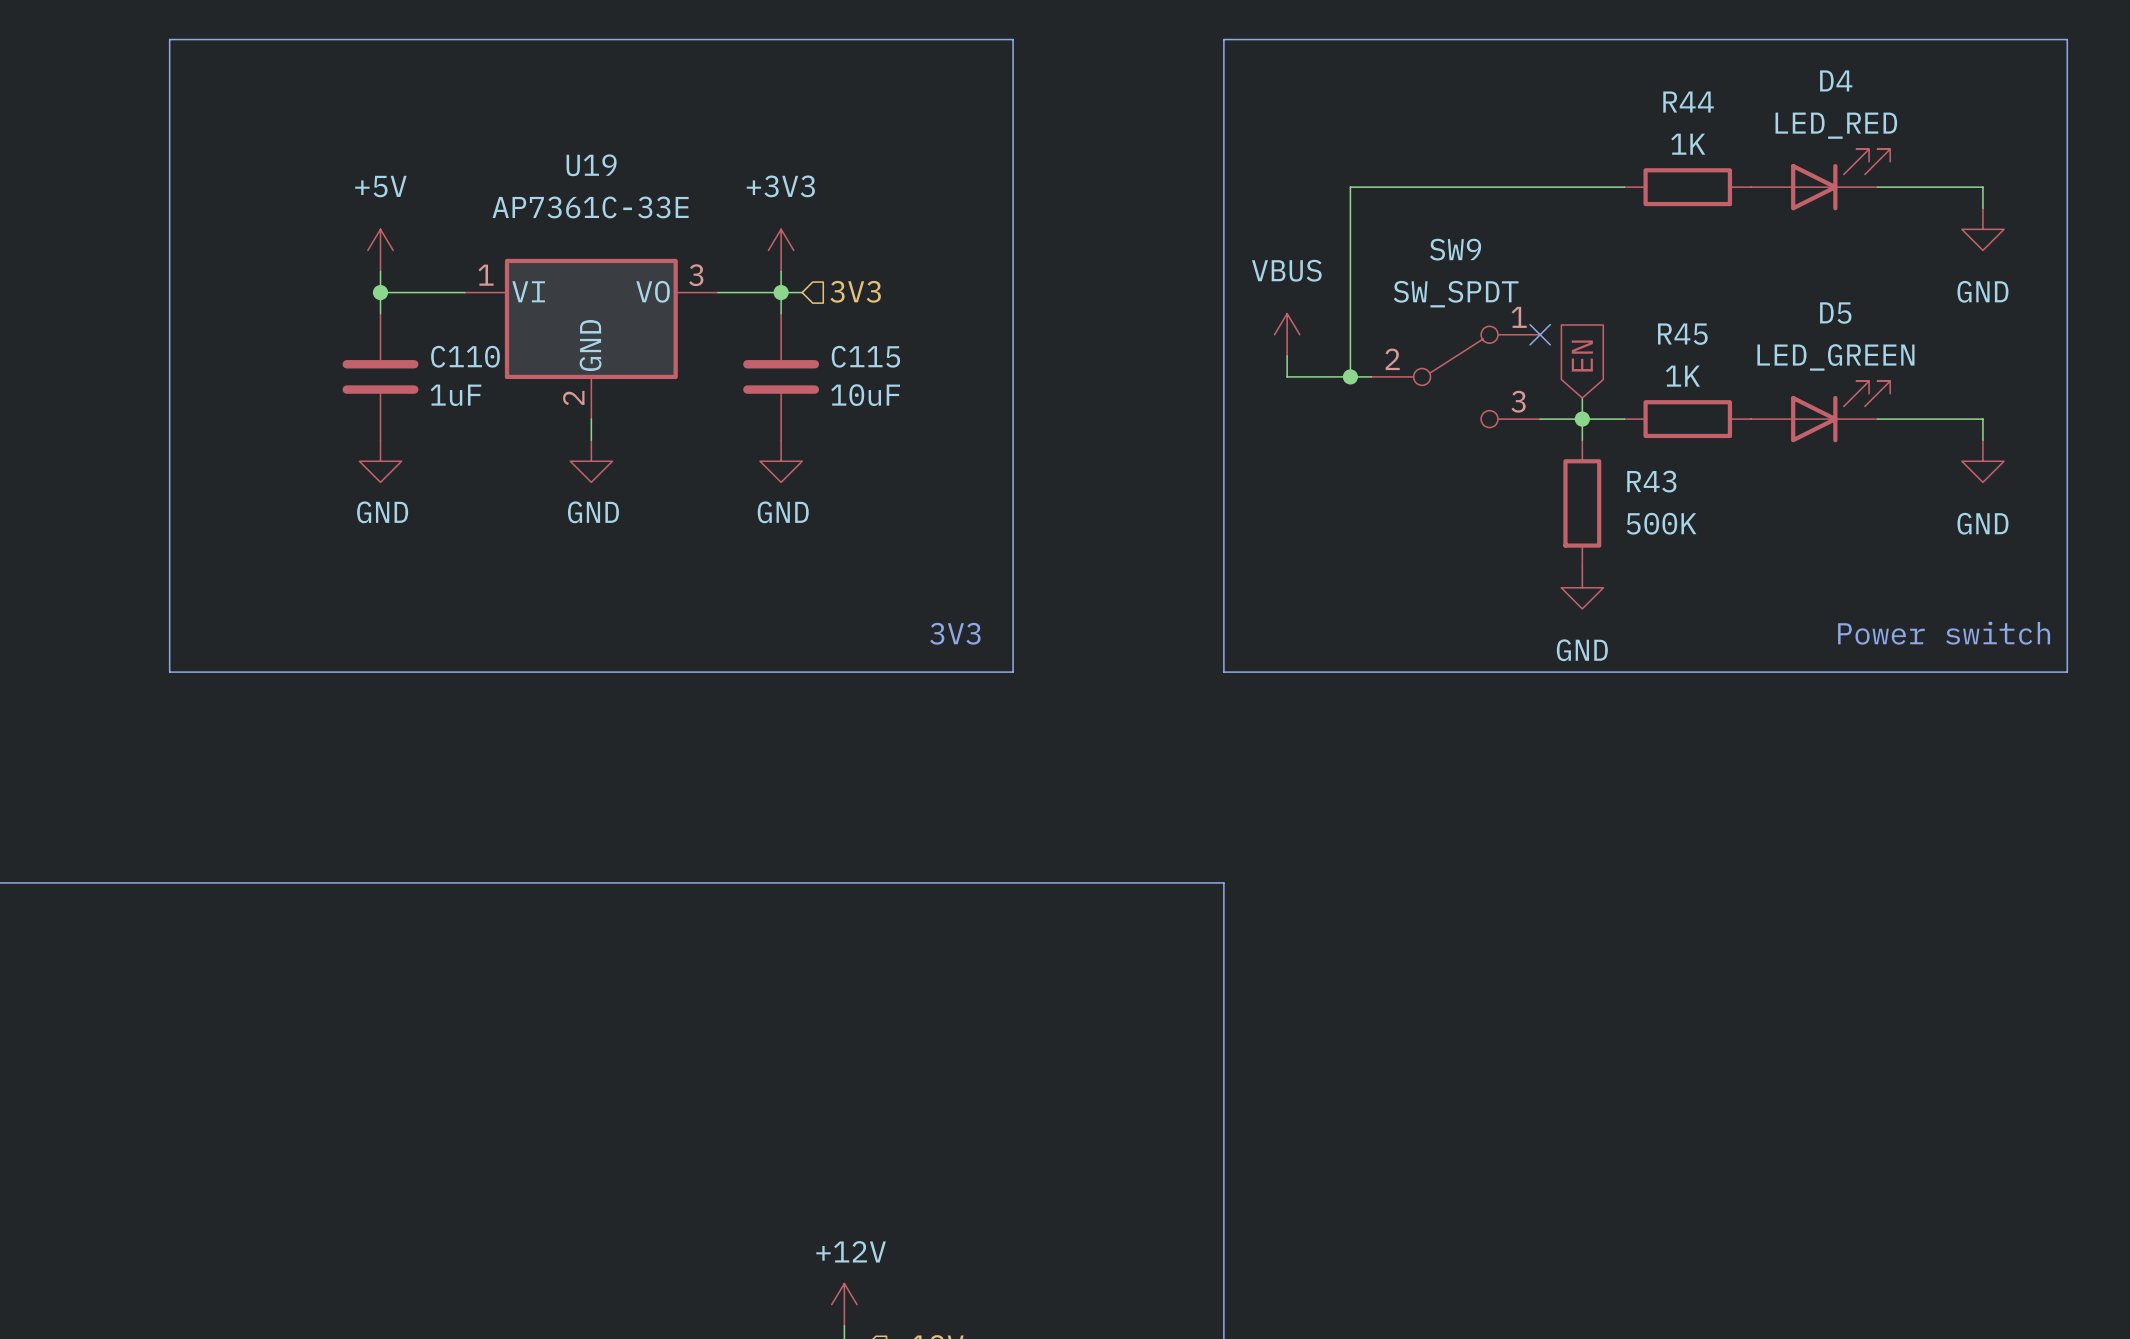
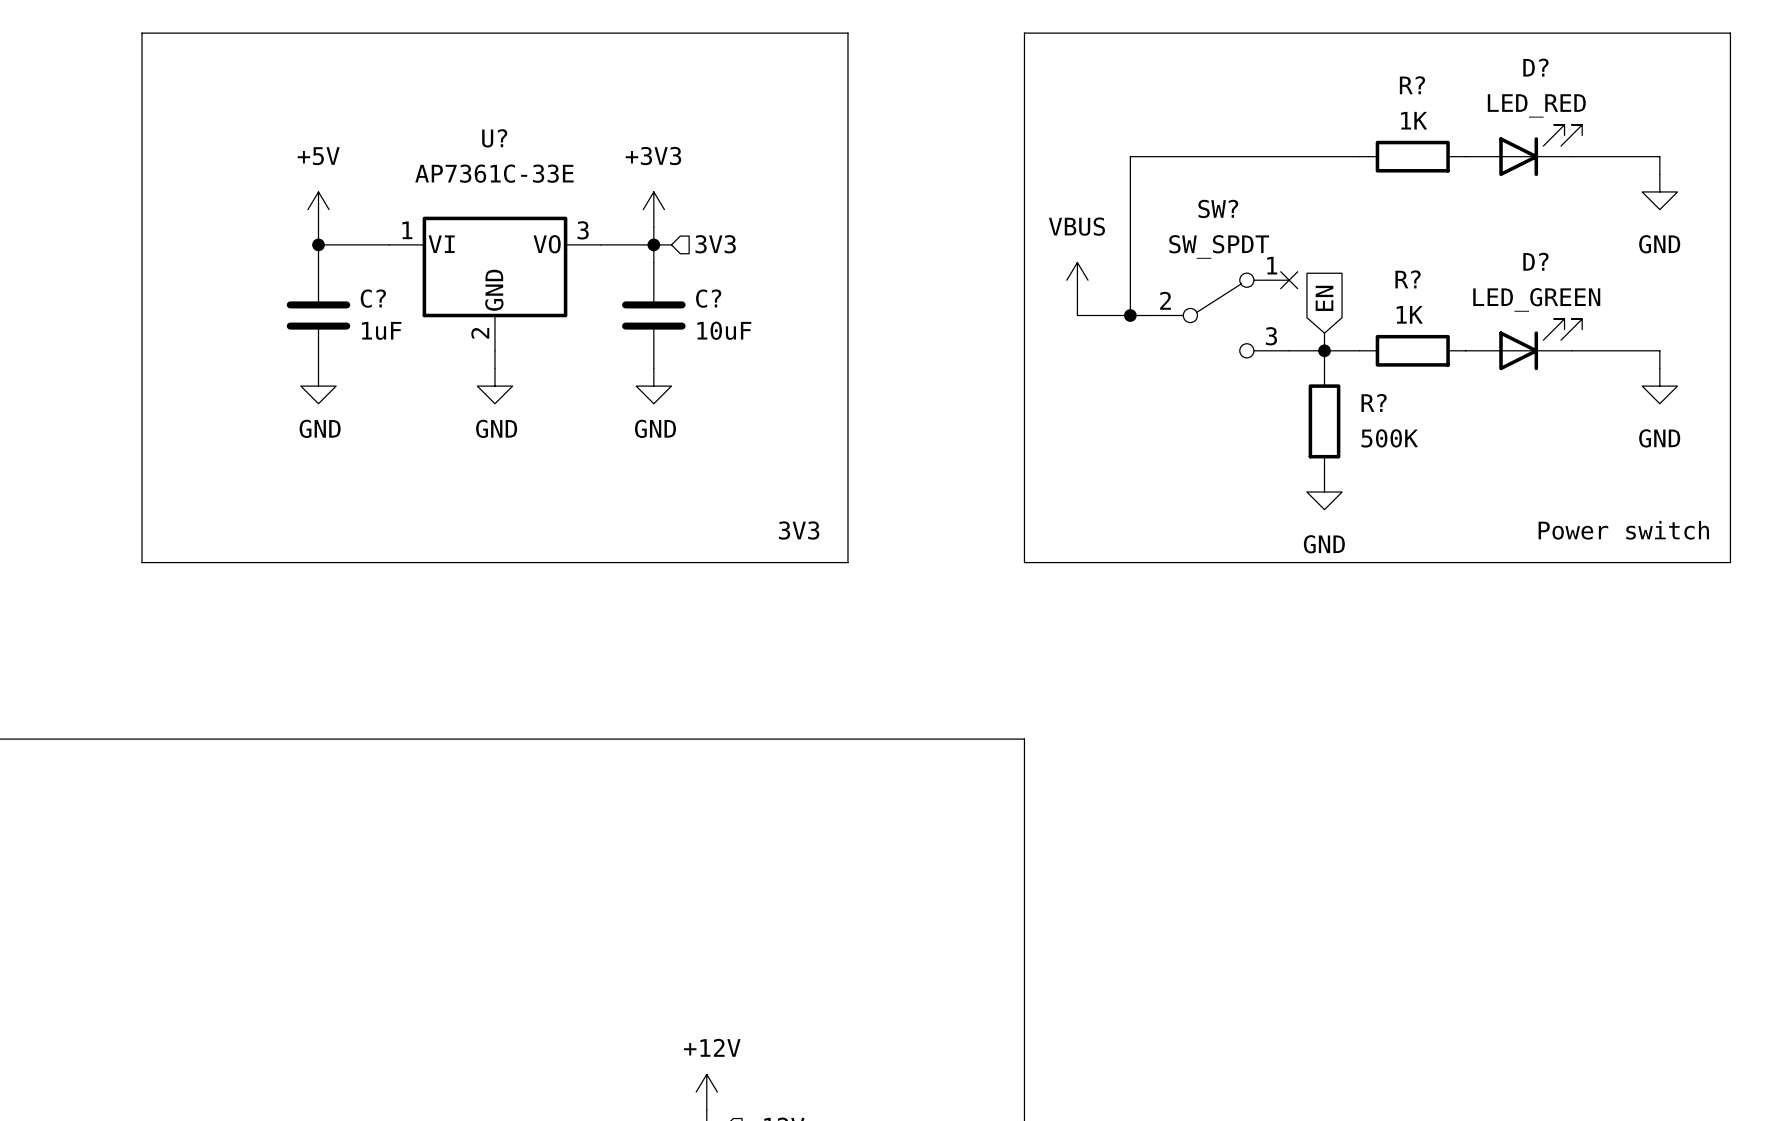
D4 name: D4 (1836, 80) -> D? (1535, 67)
R44 name: R44 (1688, 102) -> R? (1412, 85)
U19 name: U19 (591, 165) -> U? (494, 138)
SW9 name: SW9 (1455, 249) -> SW? (1218, 208)
D5 name: D5 (1835, 313) -> D? (1535, 261)
R45 name: R45 (1682, 334) -> R? (1408, 279)
C110 name: C110 (465, 356) -> C? (373, 298)
C115 name: C115 (865, 356) -> C? (708, 298)
R43 name: R43 (1651, 481) -> R? (1374, 402)

